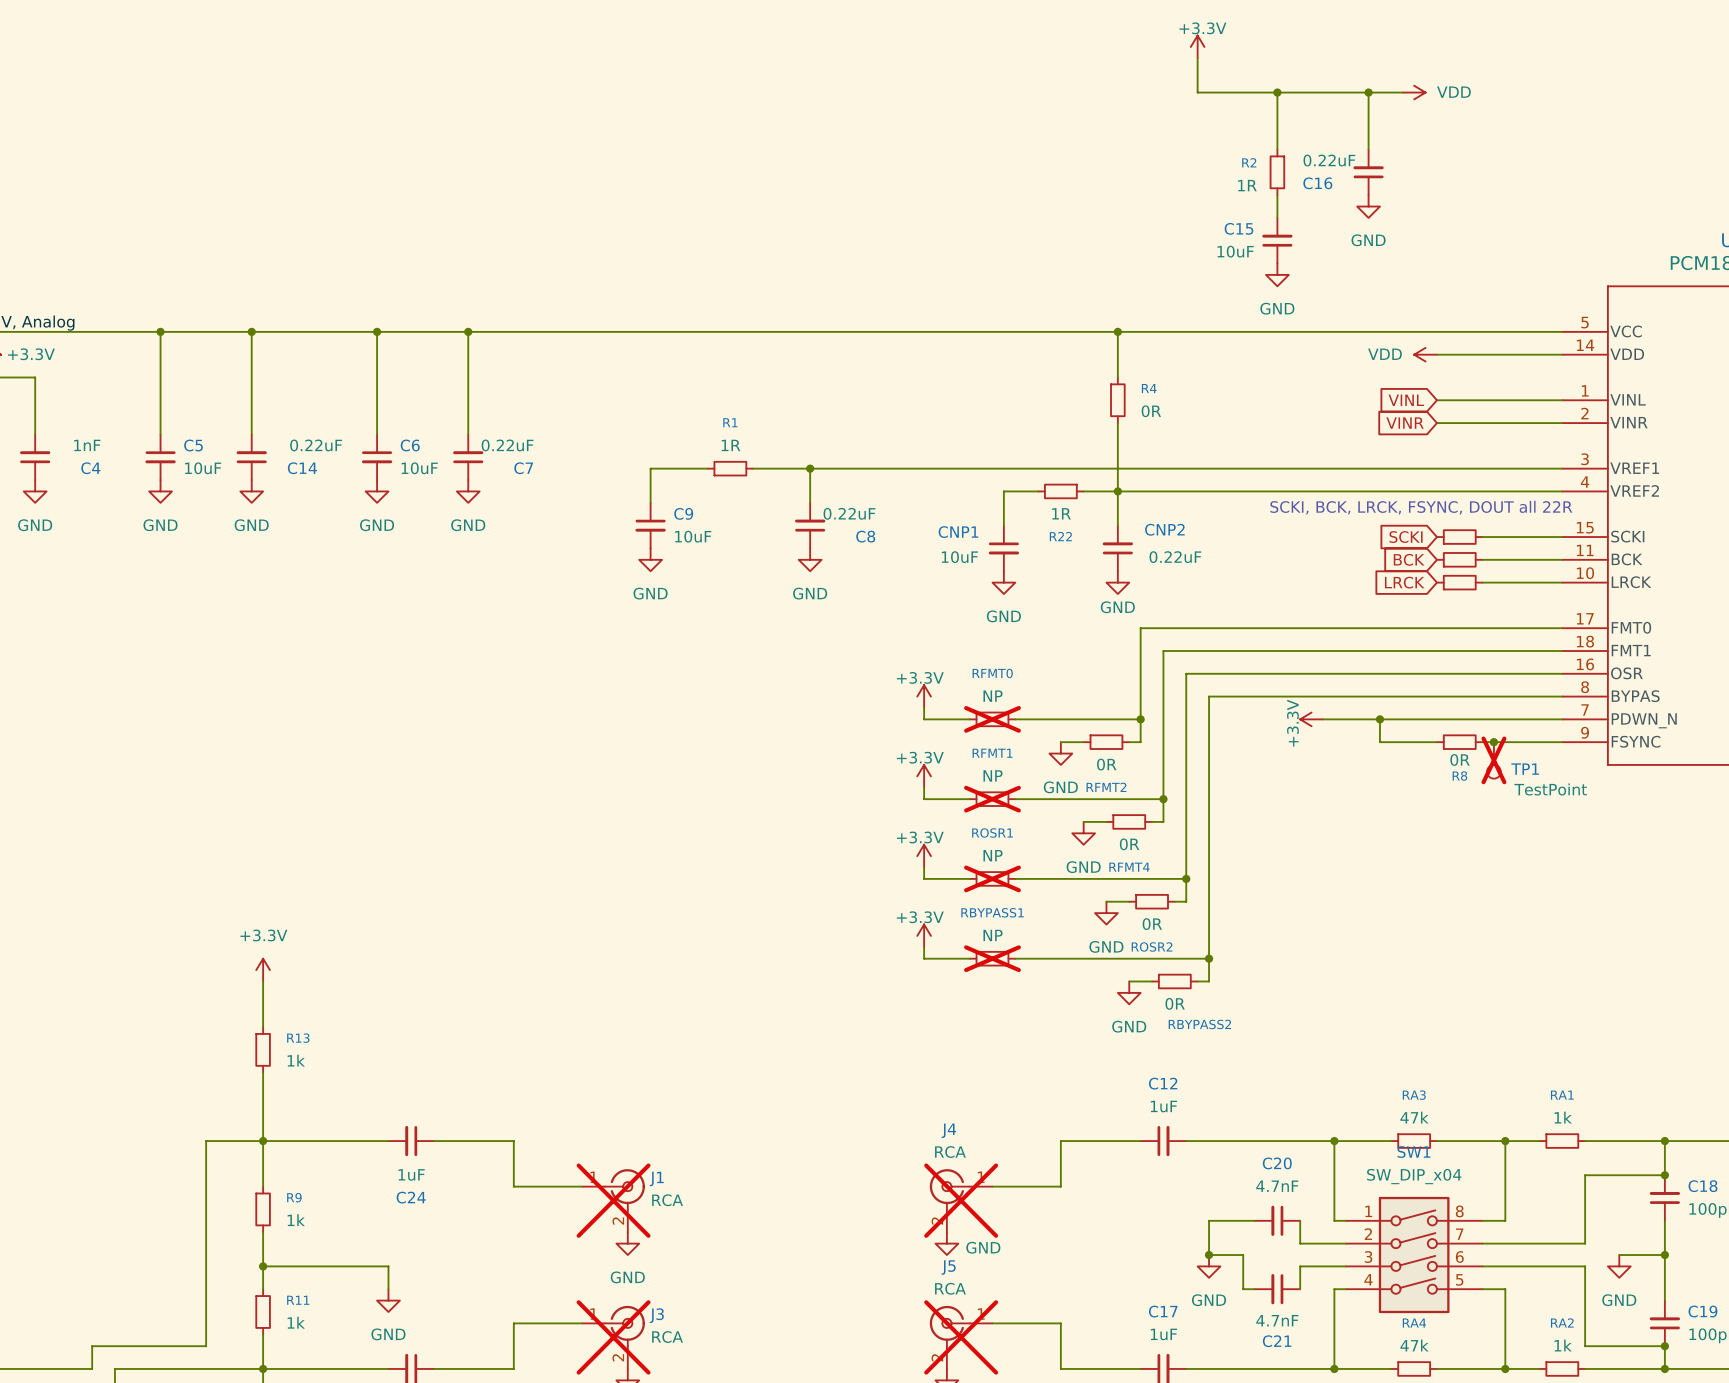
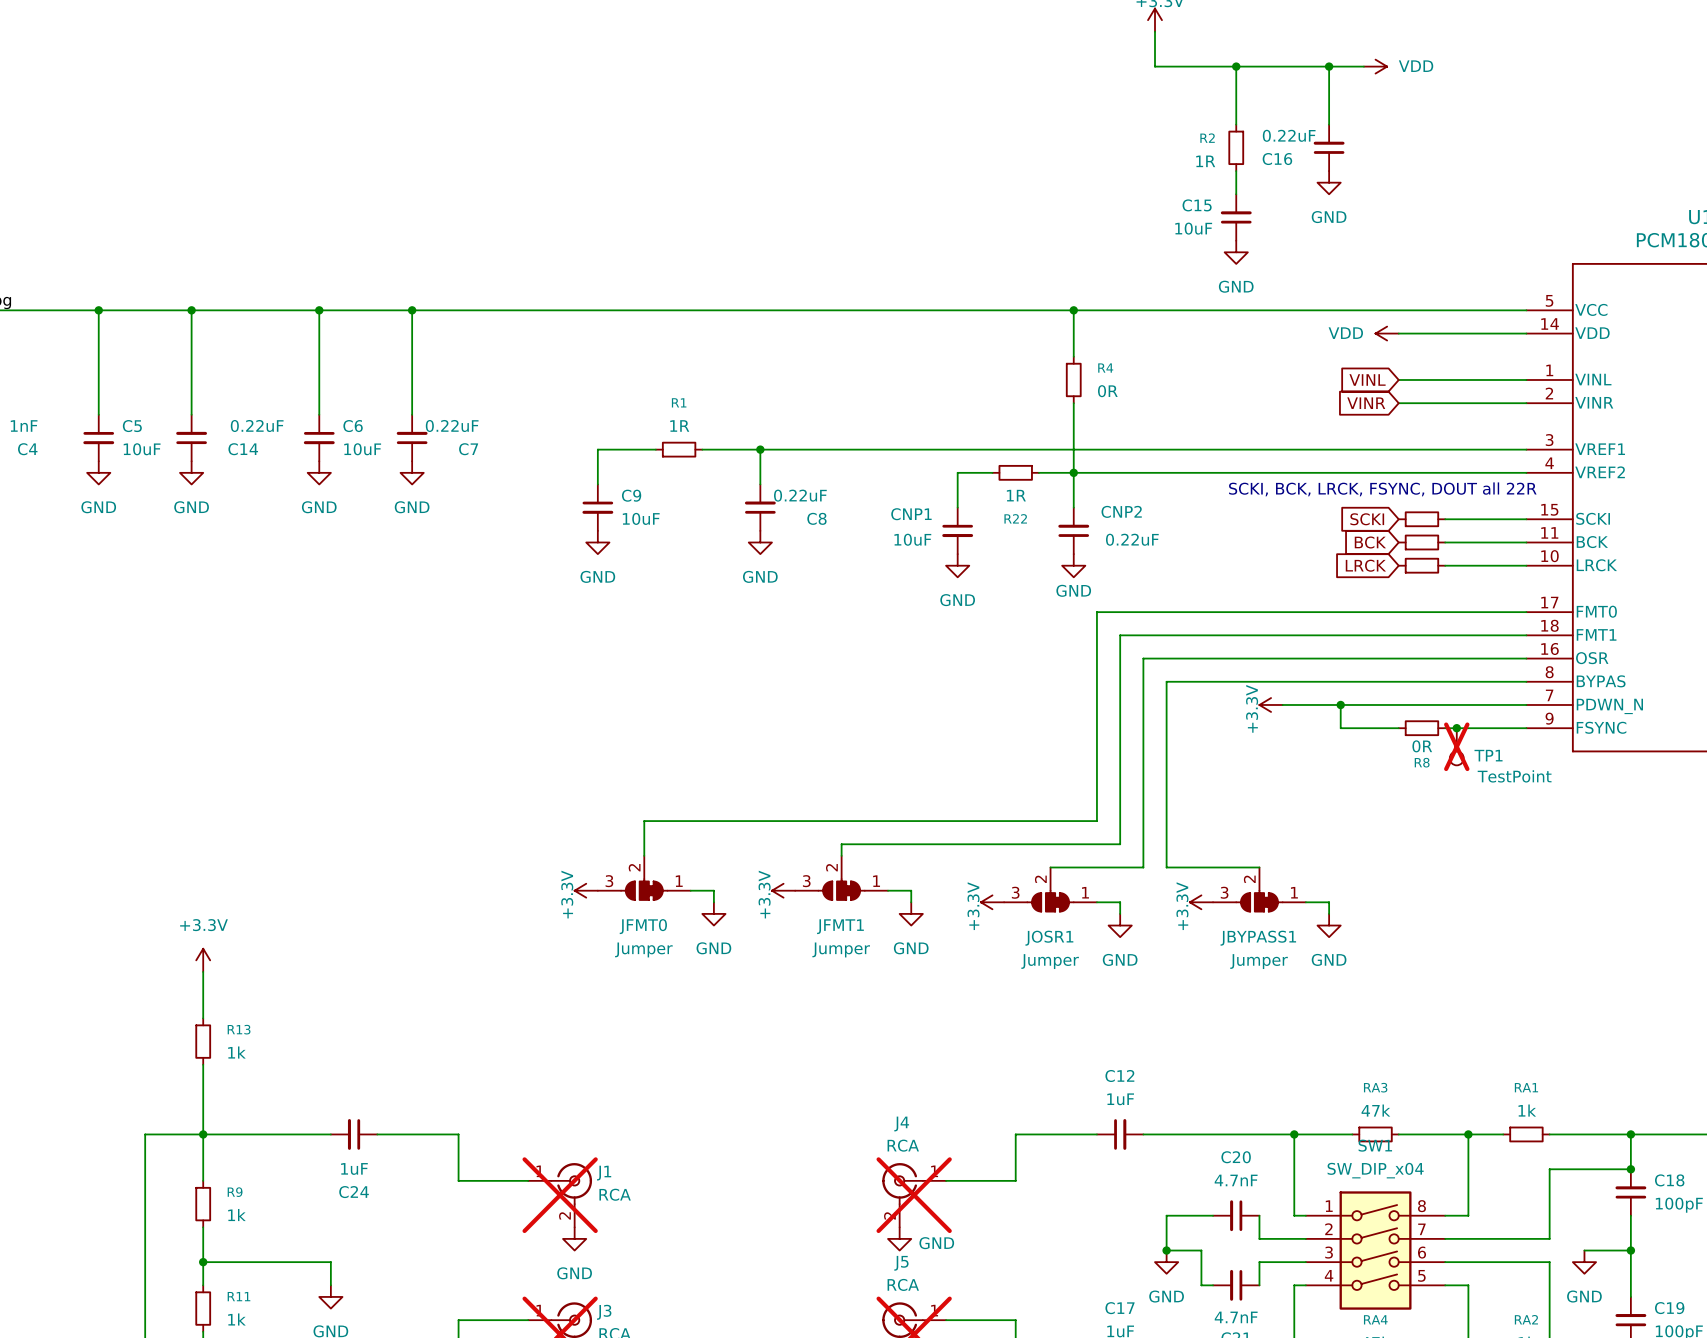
power symbol: +3.3V (924, 696) -> none
wire: (924, 707) (924, 719) (969, 719) -> none
RFMT0: NP (992, 719) -> none
wire: (1015, 719) (1140, 719) -> none
junction: (1140, 719) -> none
wire: (1060, 742) (1083, 742) -> none
RFMT2: 0R (1106, 742) -> none
wire: (1129, 742) (1140, 742) -> (644, 855) (644, 821) (1096, 821) (1096, 728)
power symbol: GND (1060, 753) -> none
power symbol: +3.3V (924, 776) -> none
wire: (924, 787) (924, 799) (969, 799) -> none
RFMT1: NP (992, 799) -> none
wire: (1015, 799) (1163, 799) -> none
junction: (1163, 799) -> none
wire: (1083, 821) (1106, 821) -> none
RFMT4: 0R (1129, 821) -> none
wire: (1152, 821) (1163, 821) -> (841, 855) (841, 844) (1120, 844) (1120, 809)
power symbol: GND (1083, 833) -> none
power symbol: +3.3V (924, 856) -> none
wire: (924, 867) (924, 878) (969, 878) -> none
ROSR1: NP (992, 878) -> none
wire: (1015, 878) (1095, 878) -> none
wire: (1186, 878) (1186, 901) (1174, 901) -> none
junction: (1186, 878) -> none
wire: (1209, 878) (1209, 981) (1197, 981) -> (1166, 867) (1259, 867)
JFMT0: none -> Jumper (644, 877)
JFMT1: none -> Jumper (841, 877)
JOSR1: none -> Jumper (1050, 889)
JBYPASS1: none -> Jumper (1259, 889)
power symbol: none -> +3.3V (586, 890)
wire: none -> (690, 890) (713, 890) (713, 902)
power symbol: none -> +3.3V (783, 890)
wire: none -> (888, 890) (911, 890) (911, 902)
wire: (1106, 901) (1129, 901) -> none
ROSR2: 0R (1152, 901) -> none
power symbol: none -> +3.3V (992, 902)
power symbol: GND (1106, 913) -> none
wire: none -> (1096, 902) (1120, 902) (1120, 913)
power symbol: none -> +3.3V (1201, 902)
wire: none -> (1305, 902) (1329, 902) (1329, 913)
power symbol: none -> GND (713, 913)
power symbol: none -> GND (911, 913)
power symbol: +3.3V (924, 935) -> none
power symbol: none -> GND (1120, 925)
power symbol: none -> GND (1329, 925)
wire: (924, 947) (924, 958) (969, 958) -> none
RBYPASS1: NP (992, 958) -> none
wire: (1015, 958) (1209, 958) -> none
junction: (1209, 958) -> none
wire: (1129, 981) (1152, 981) -> none
RBYPASS2: 0R (1174, 981) -> none
power symbol: GND (1129, 992) -> none

